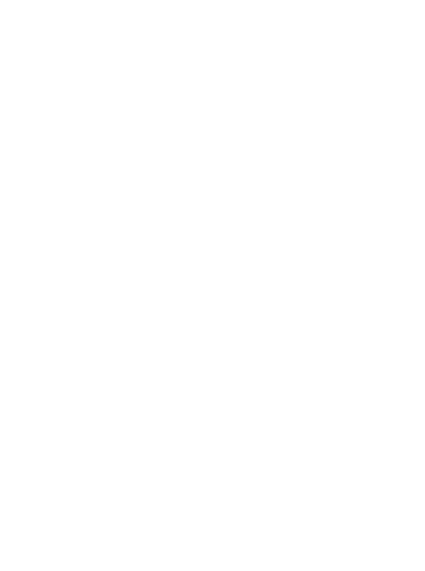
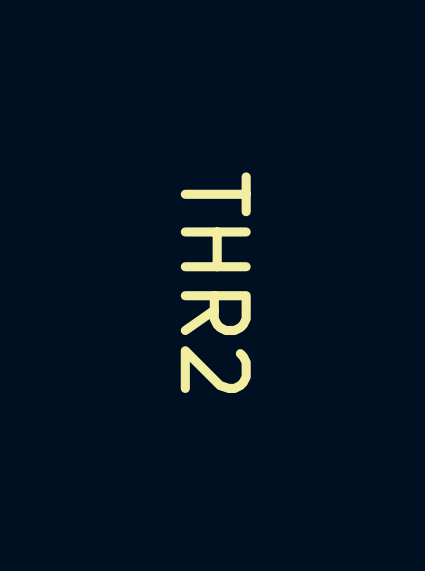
text: none -> THR2 (215, 282)

